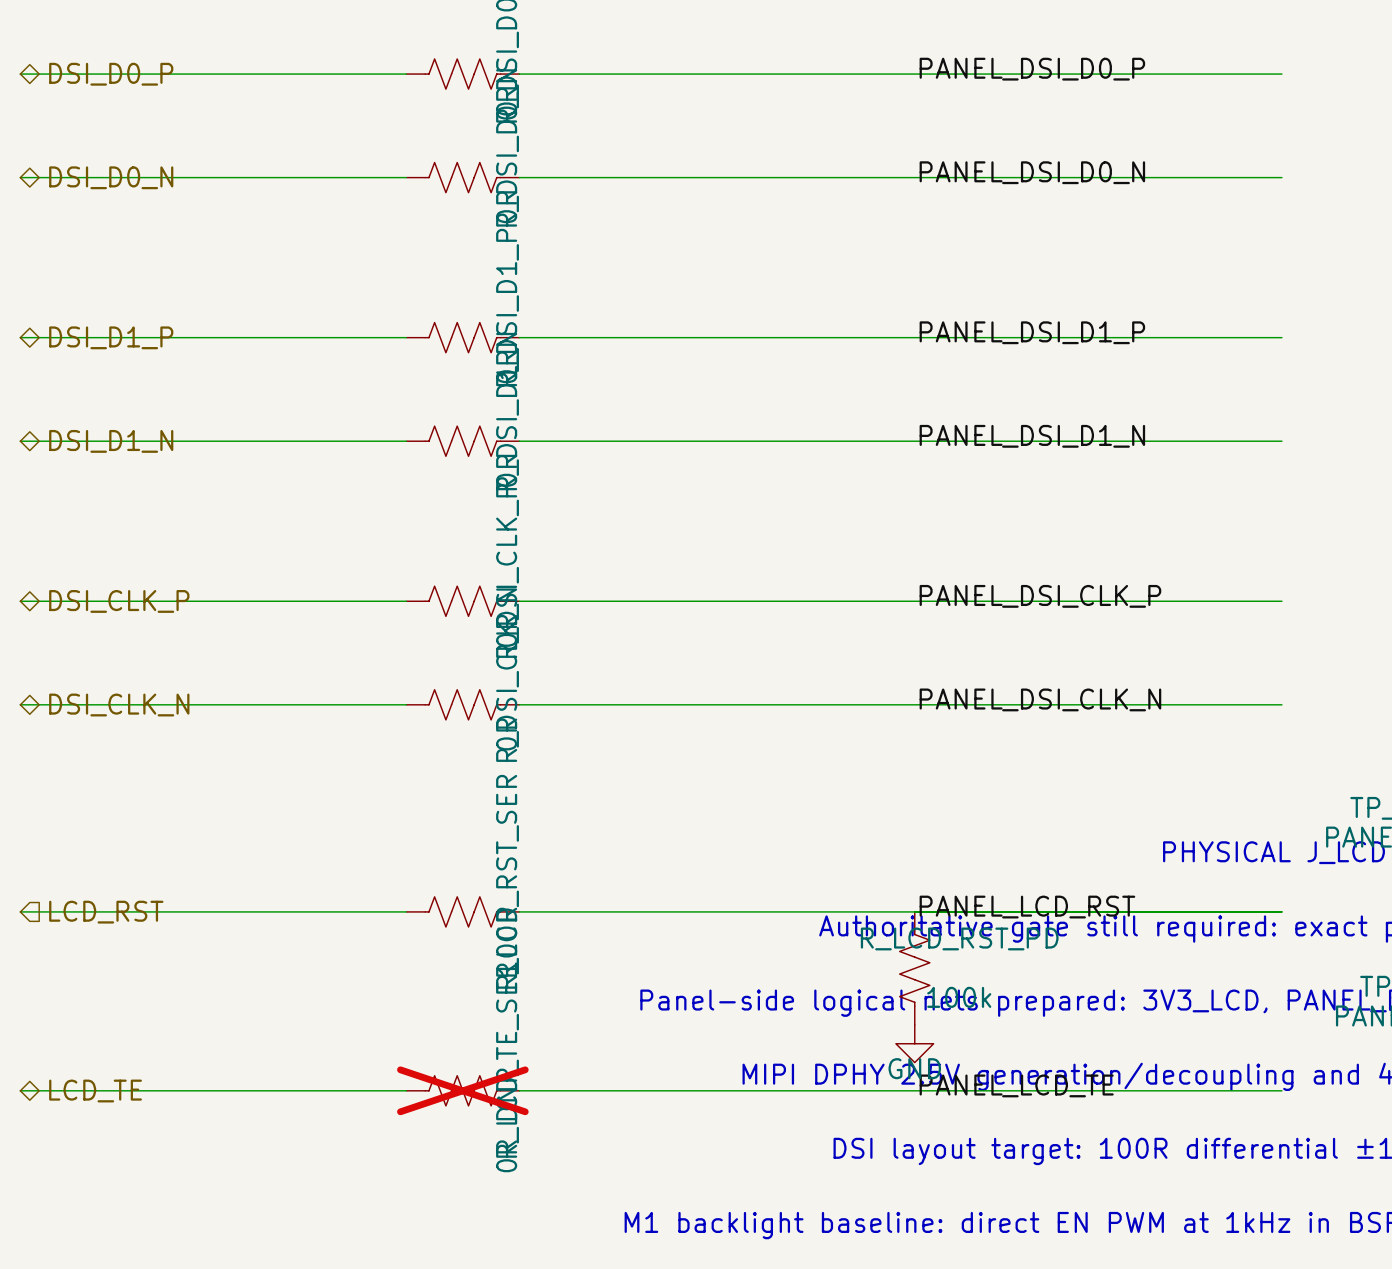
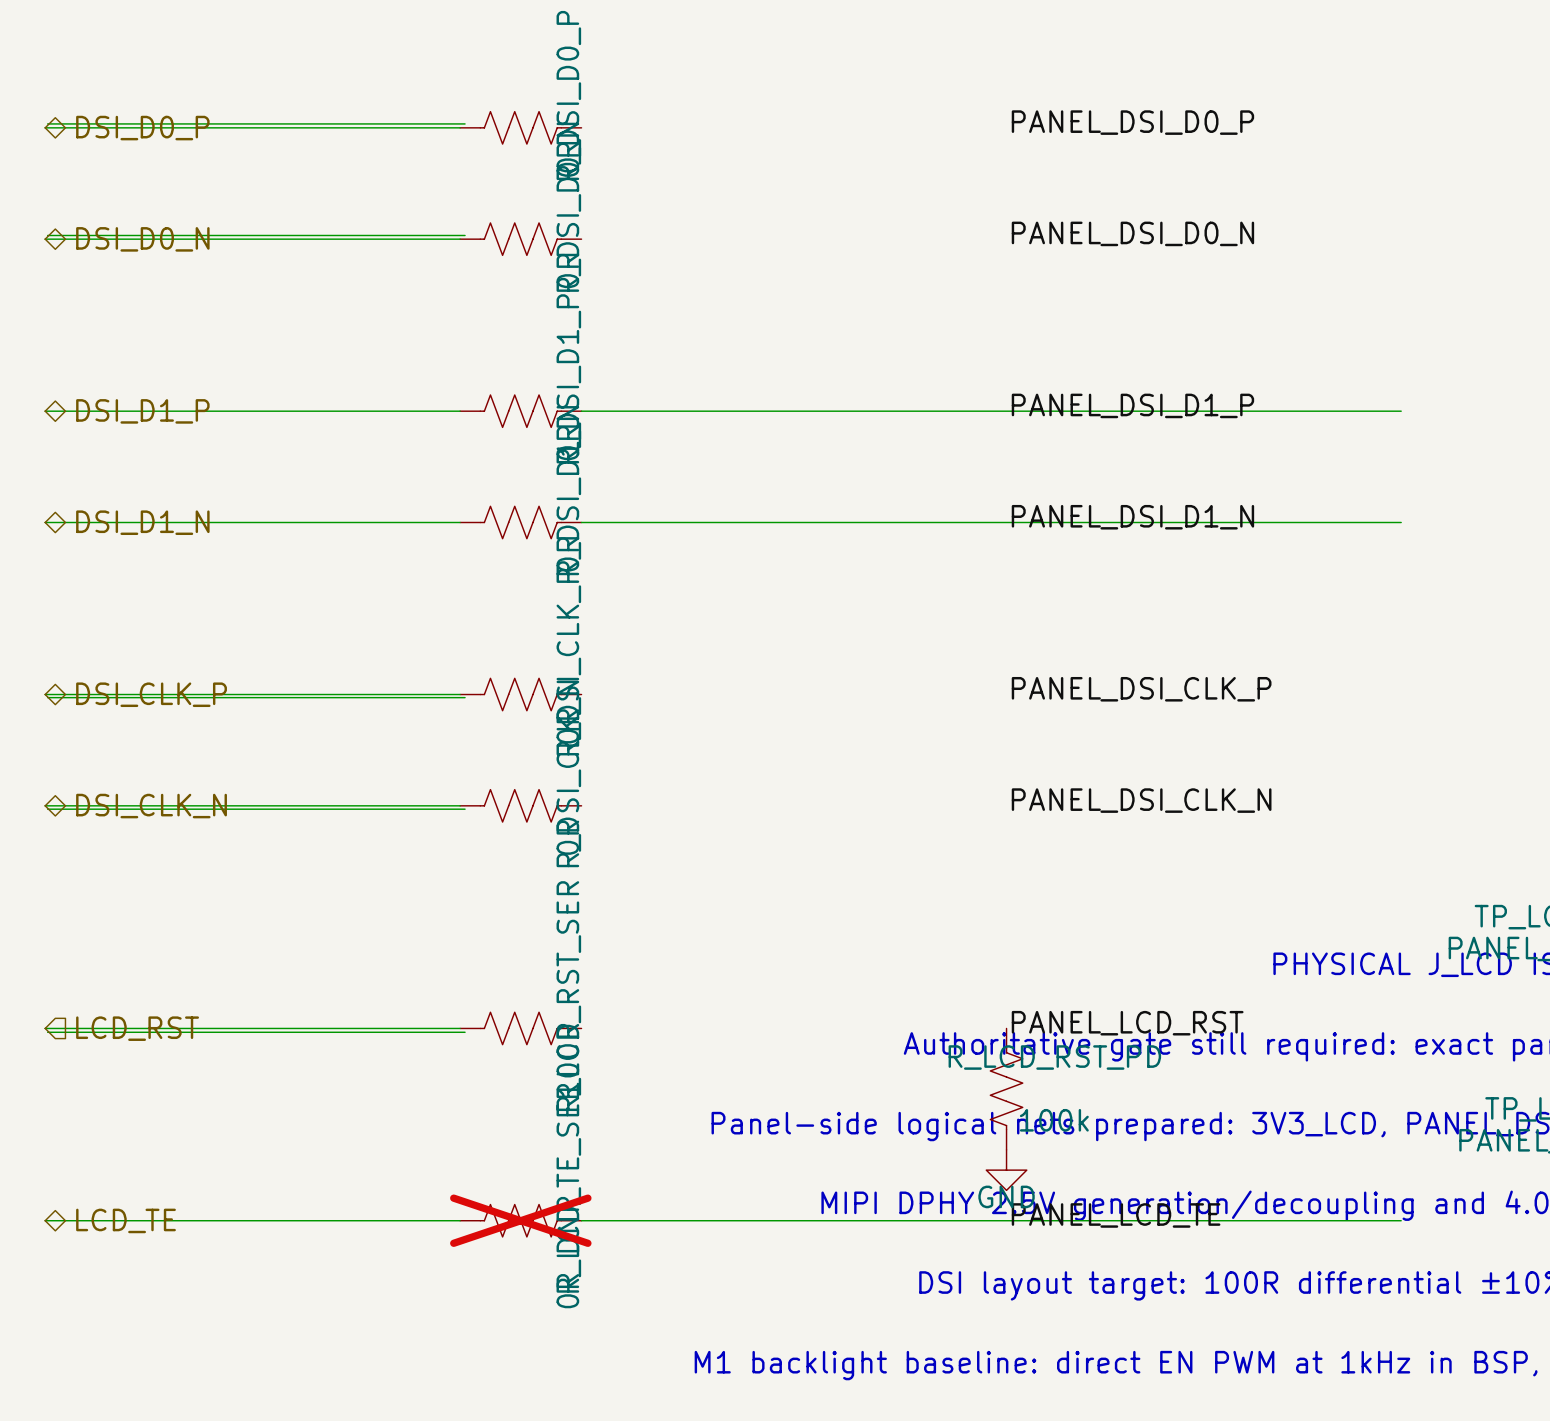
wire: none -> (47, 123) (465, 123)
wire: (519, 74) (1281, 74) -> none
wire: none -> (47, 235) (465, 235)
wire: (519, 177) (1281, 177) -> none
wire: (519, 601) (1281, 601) -> none
wire: none -> (47, 697) (465, 697)
wire: (519, 704) (1281, 704) -> none
wire: none -> (47, 809) (465, 809)
wire: (519, 911) (1281, 911) -> none
wire: none -> (47, 1032) (465, 1032)

